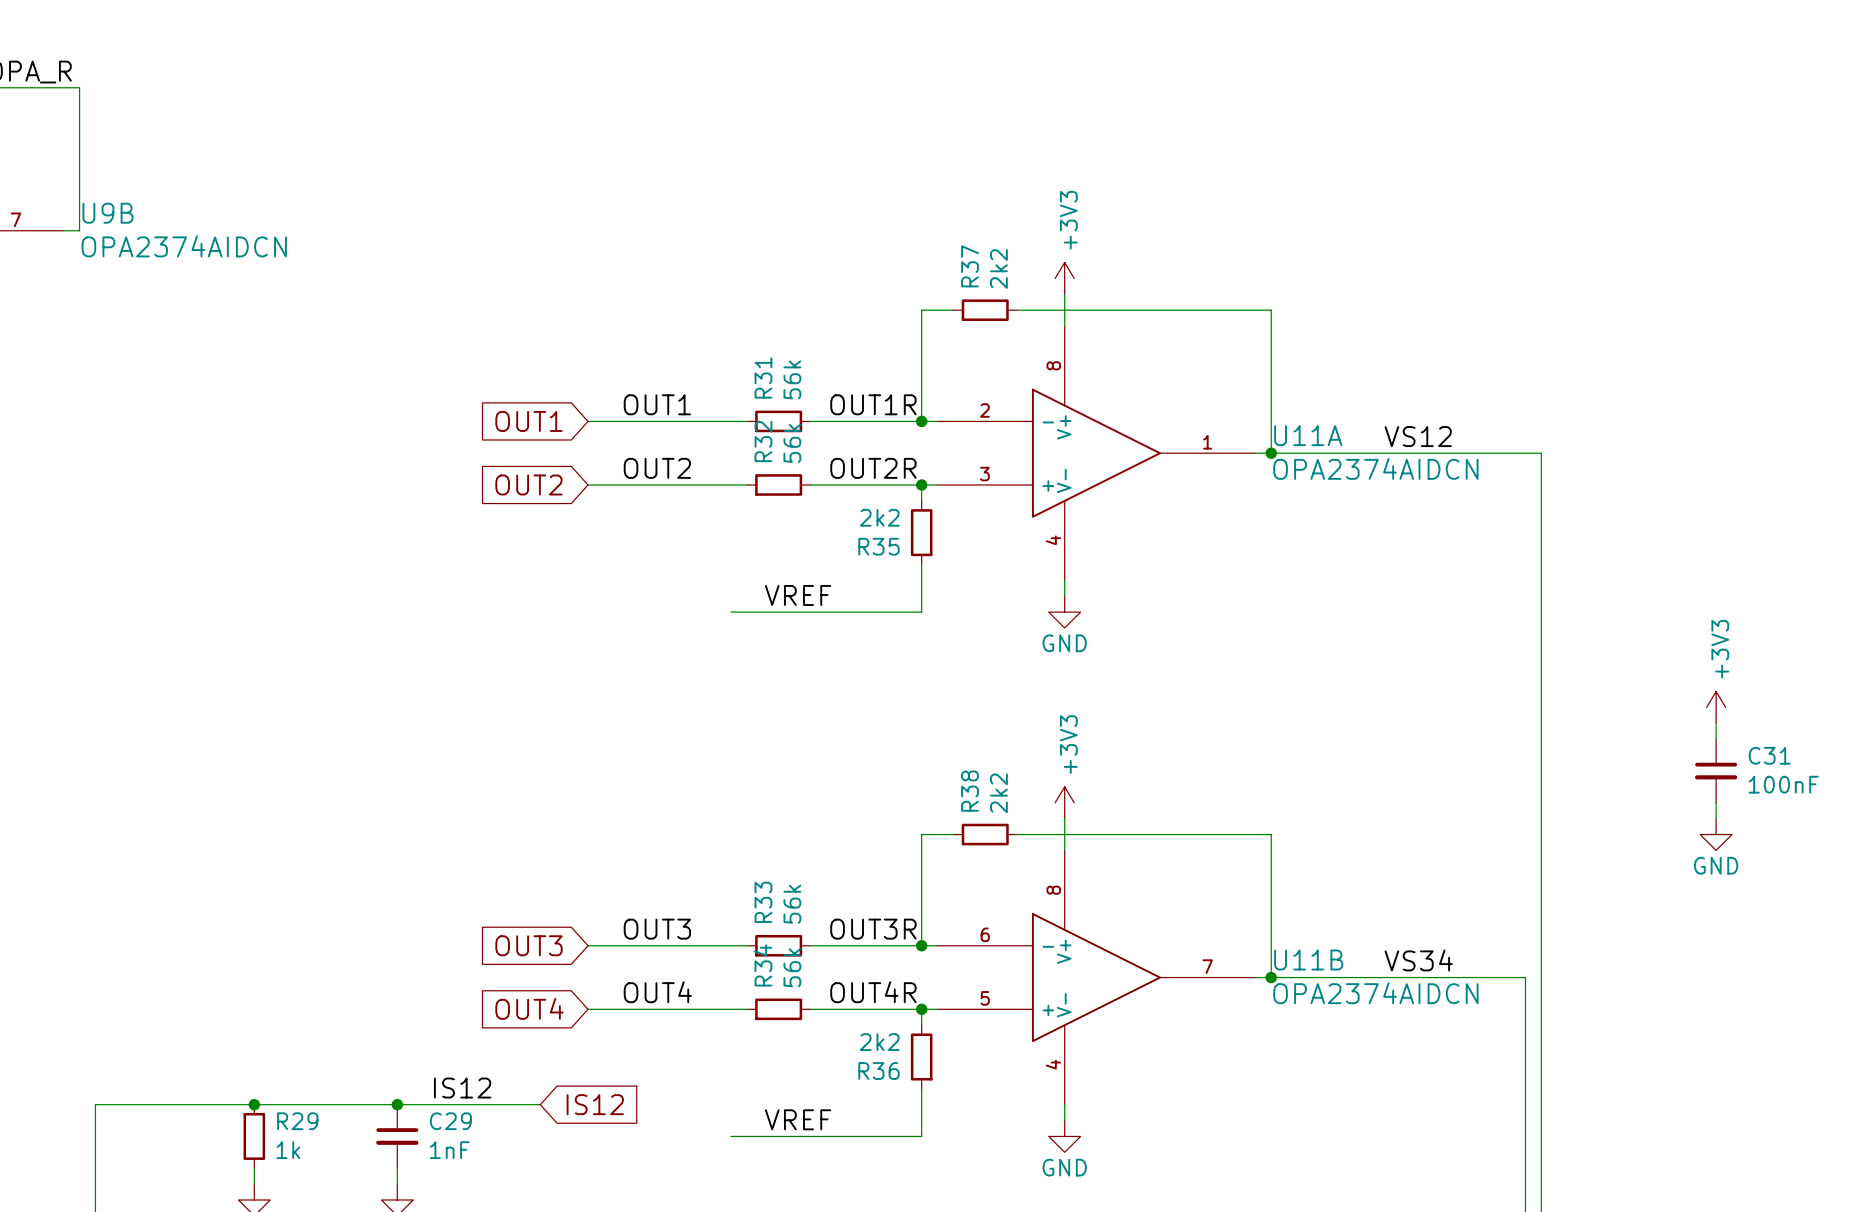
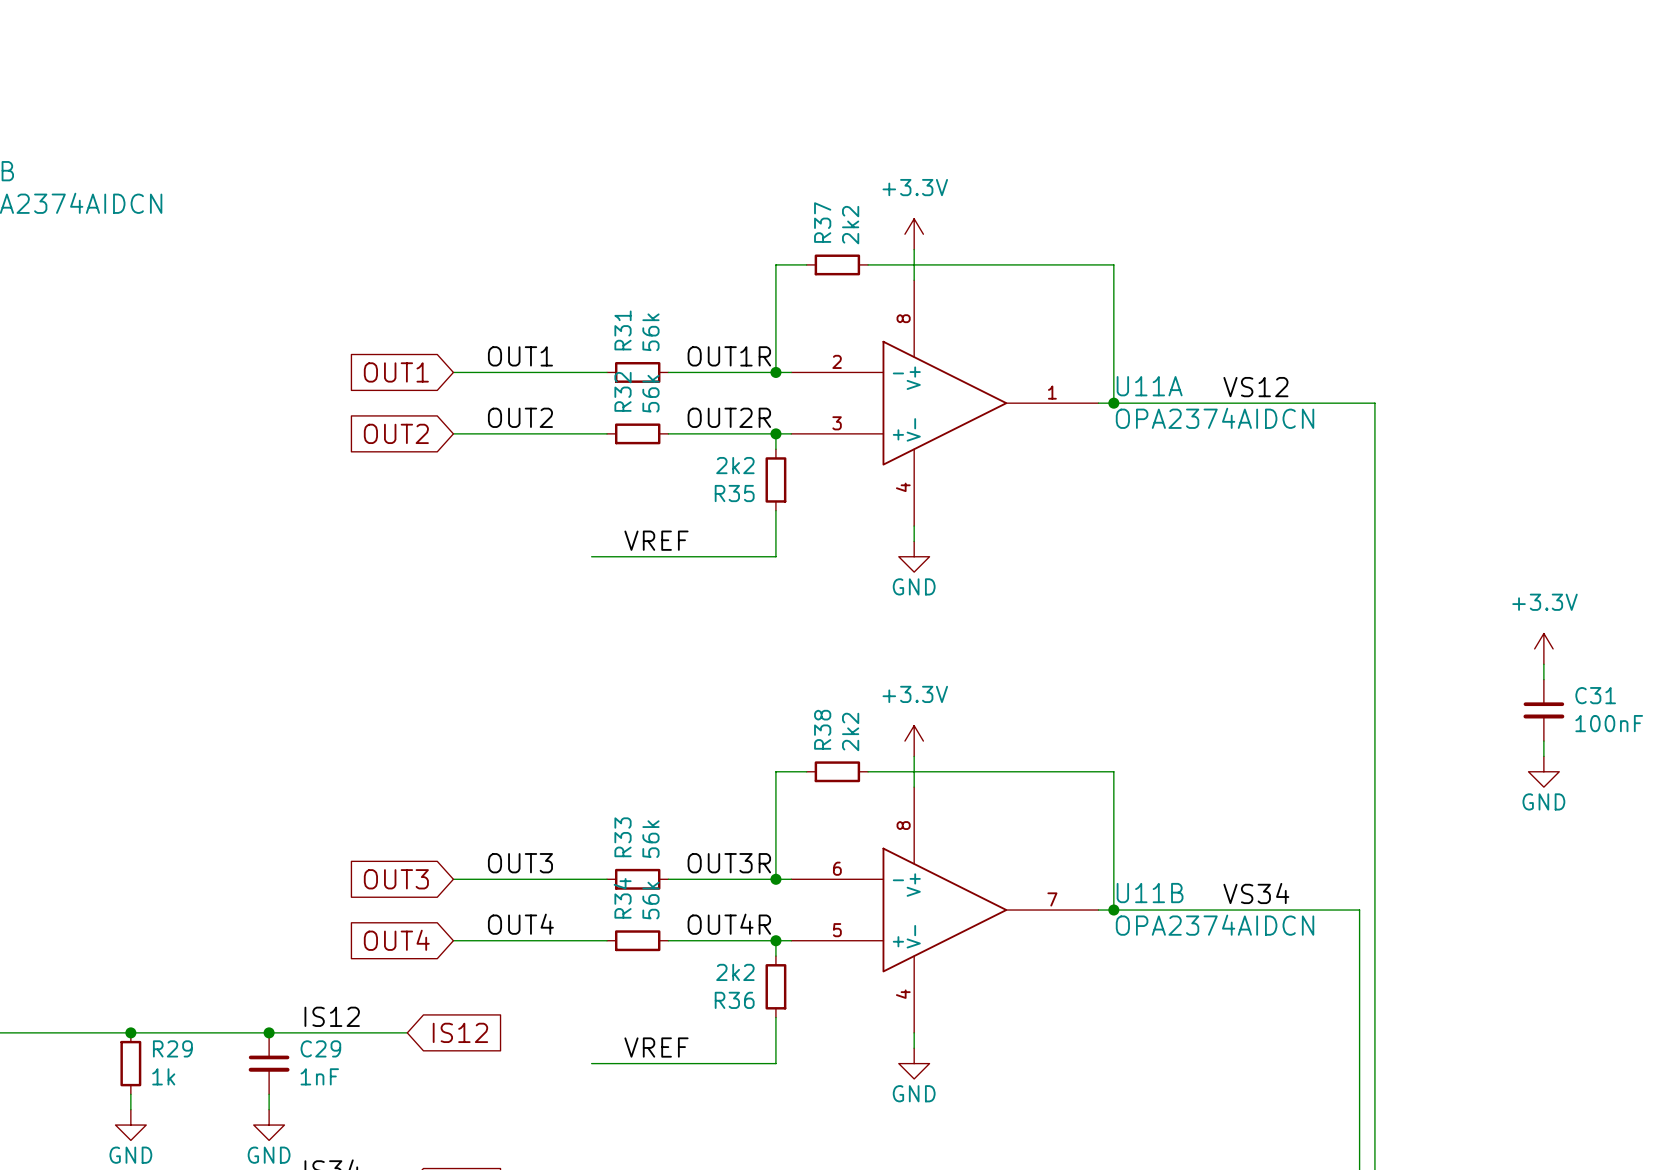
power symbol: +3V3 (1064, 278) -> +3.3V (914, 234)
power symbol: +3V3 (1716, 707) -> +3.3V (1543, 648)
power symbol: +3V3 (1064, 802) -> +3.3V (914, 741)

